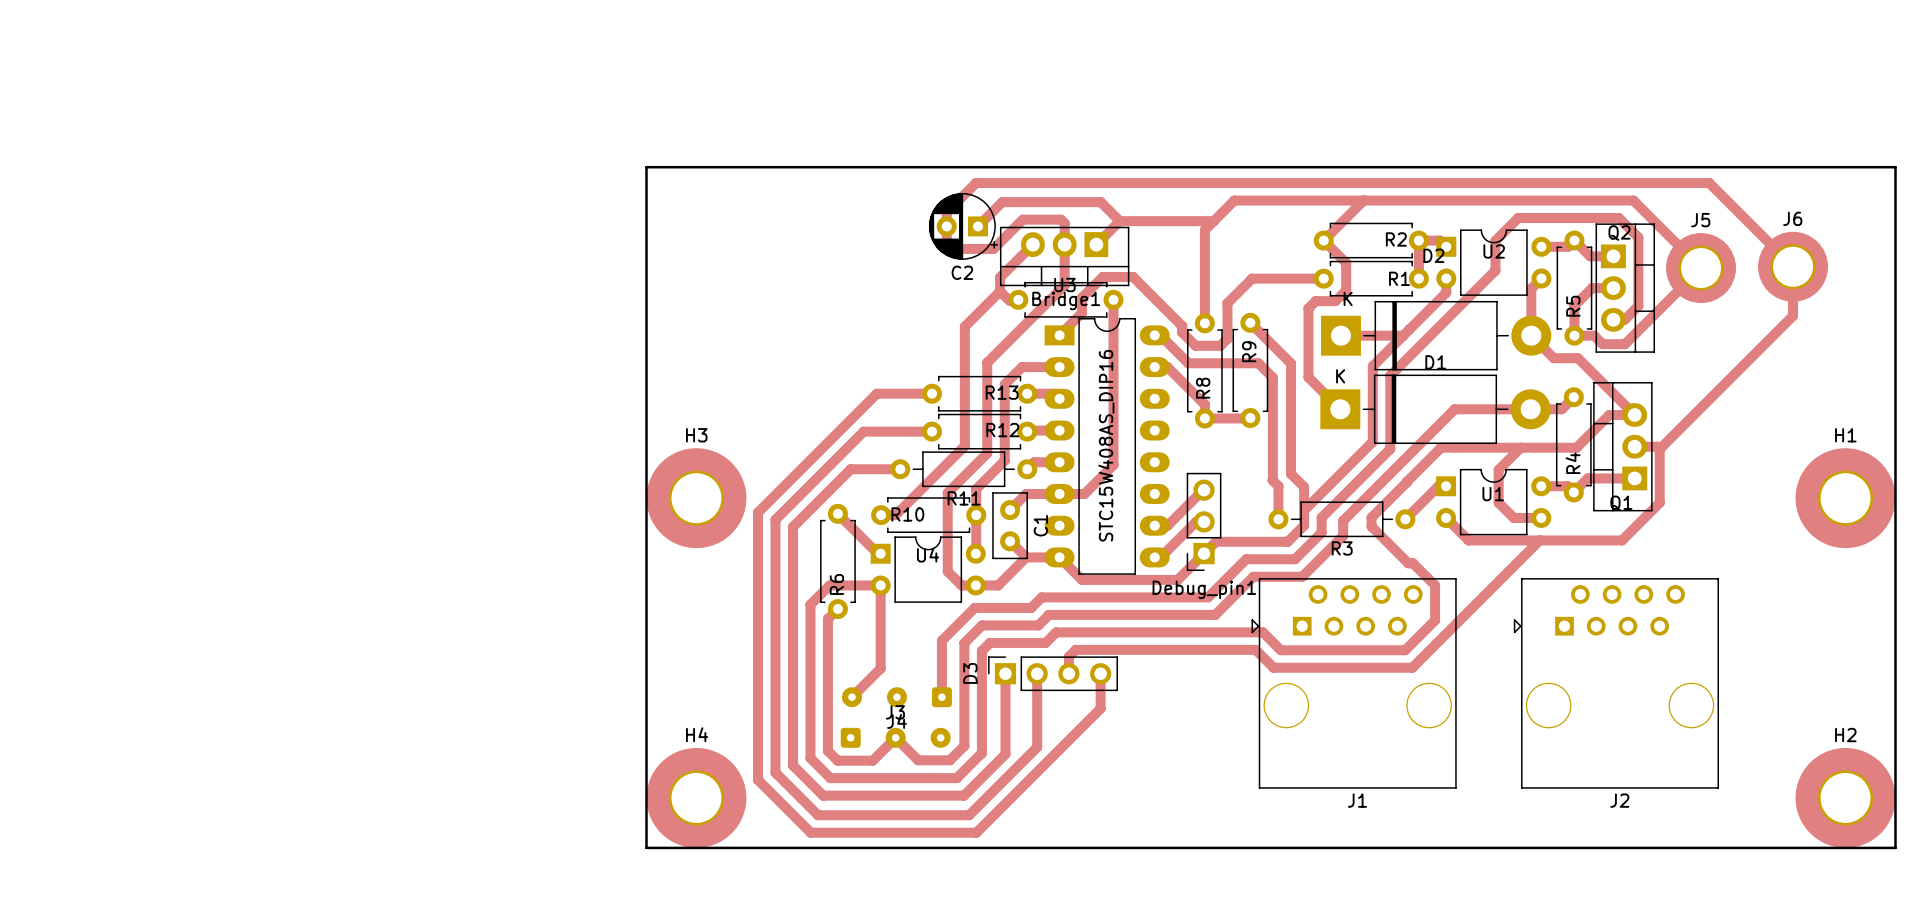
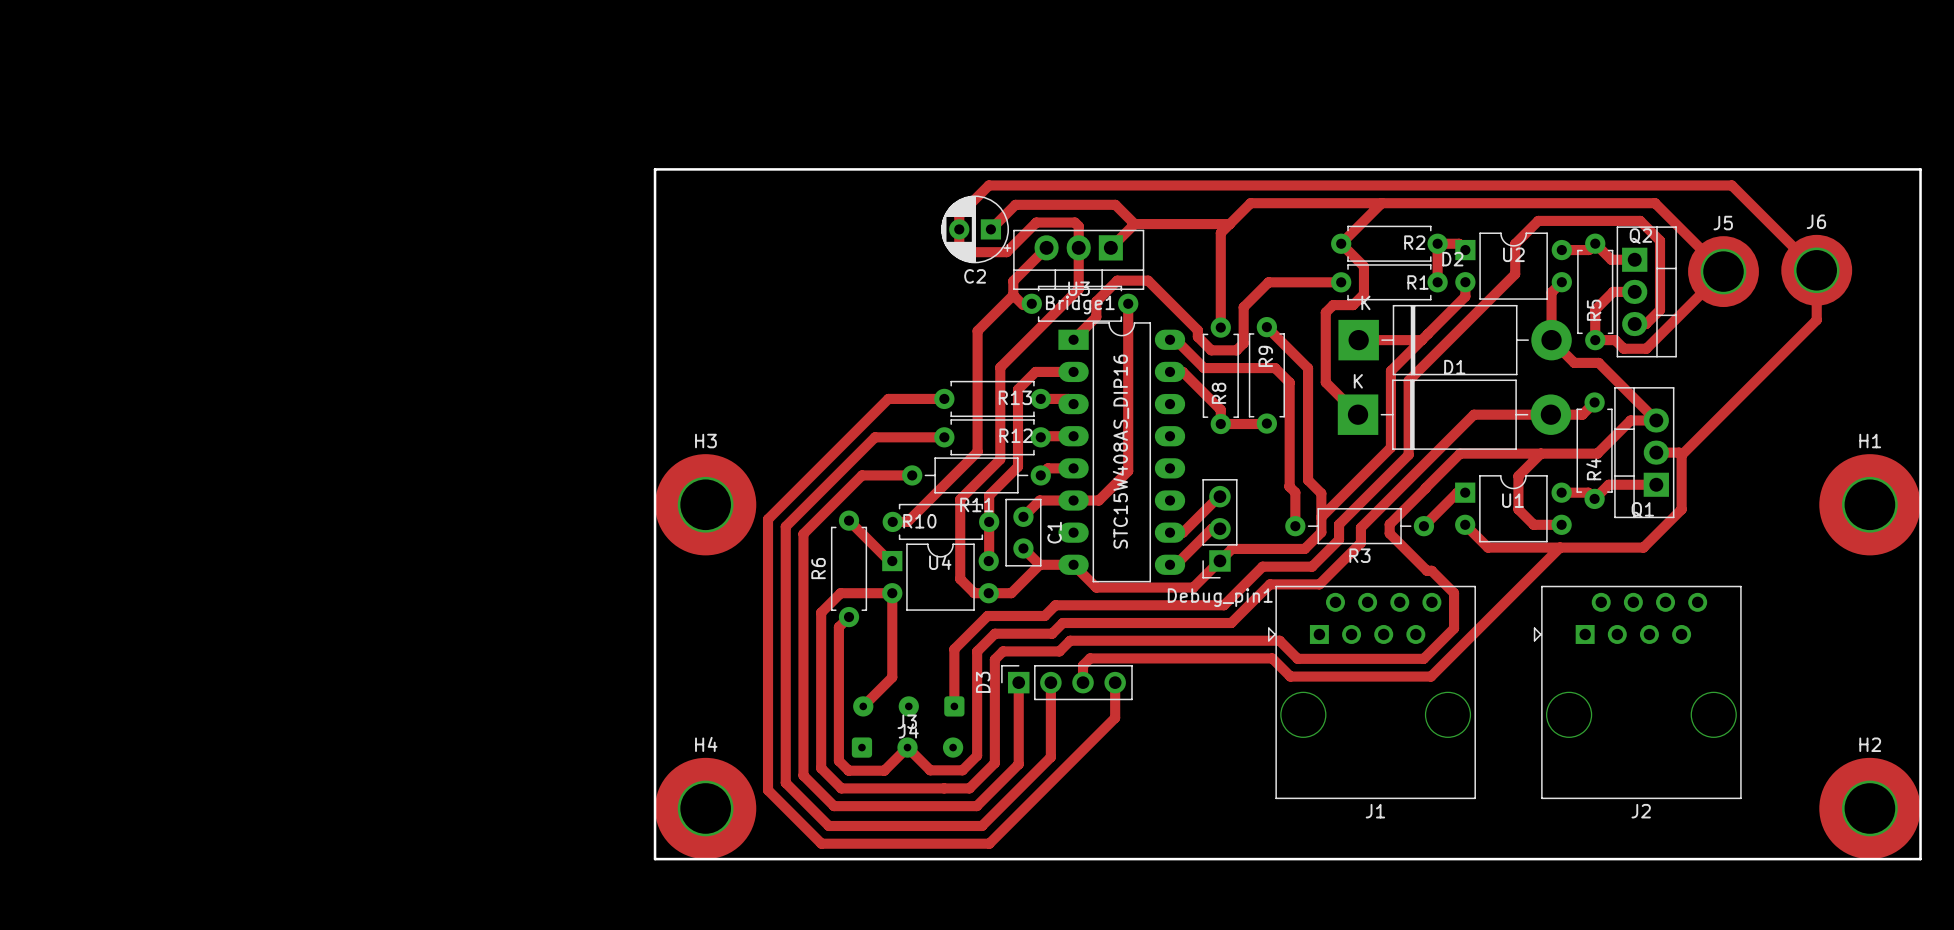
R6 name position: R6 (836, 584) -> R6 (818, 568)

